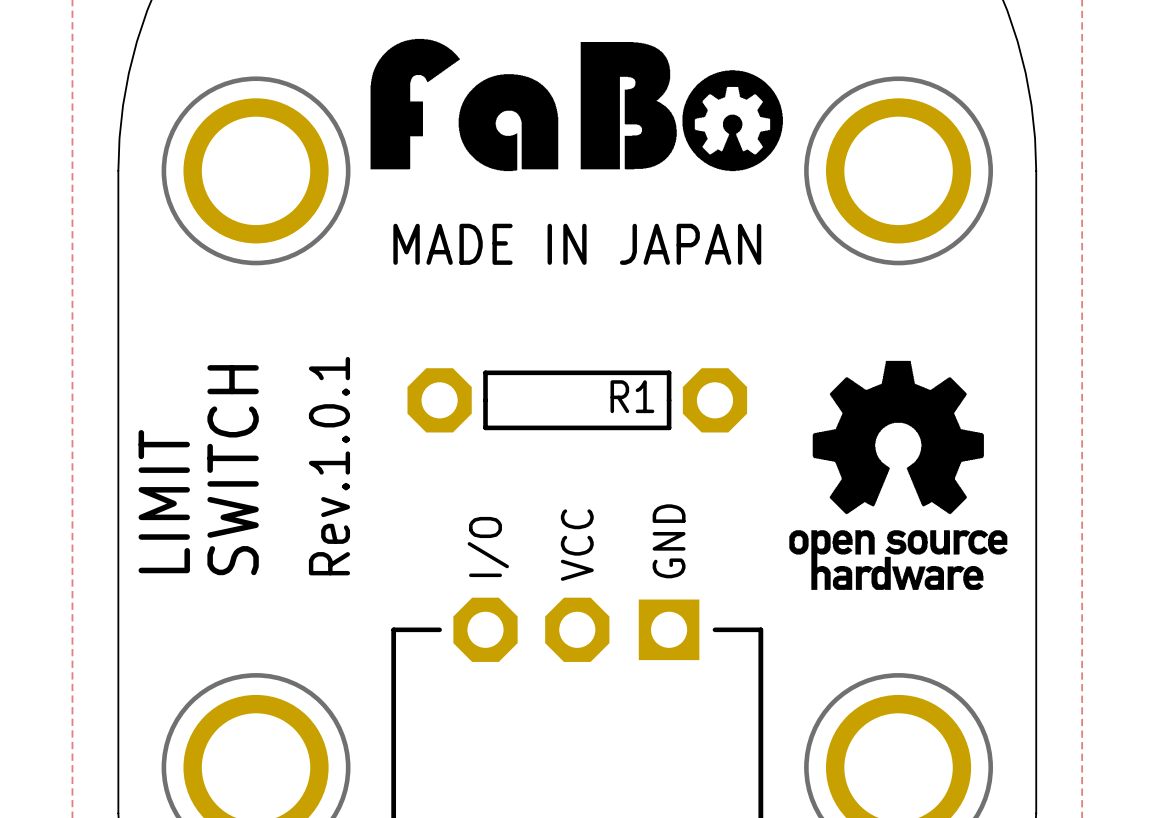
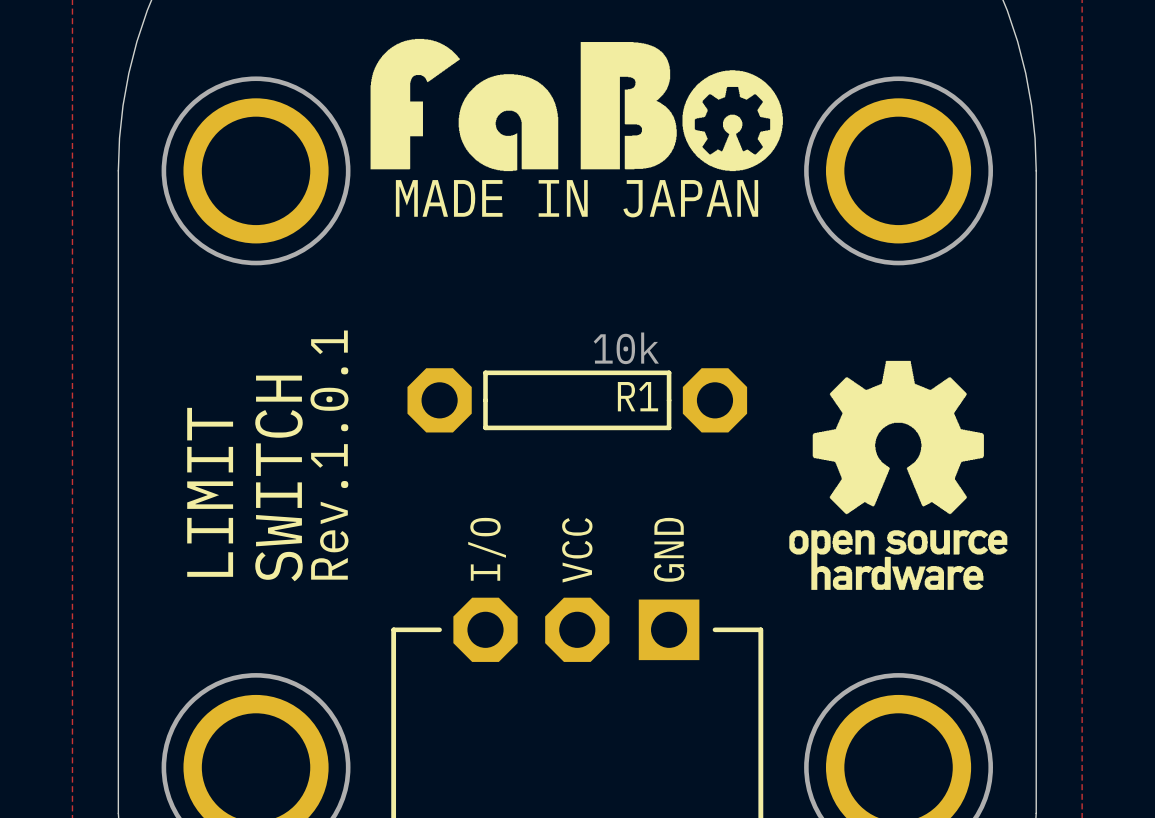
text position: MADE IN JAPAN (577, 244) -> MADE IN JAPAN (577, 198)
R1 value: none -> 10k (626, 348)
text position: SWITCH (233, 470) -> SWITCH (278, 478)
text position: LIMIT (164, 501) -> LIMIT (210, 492)

